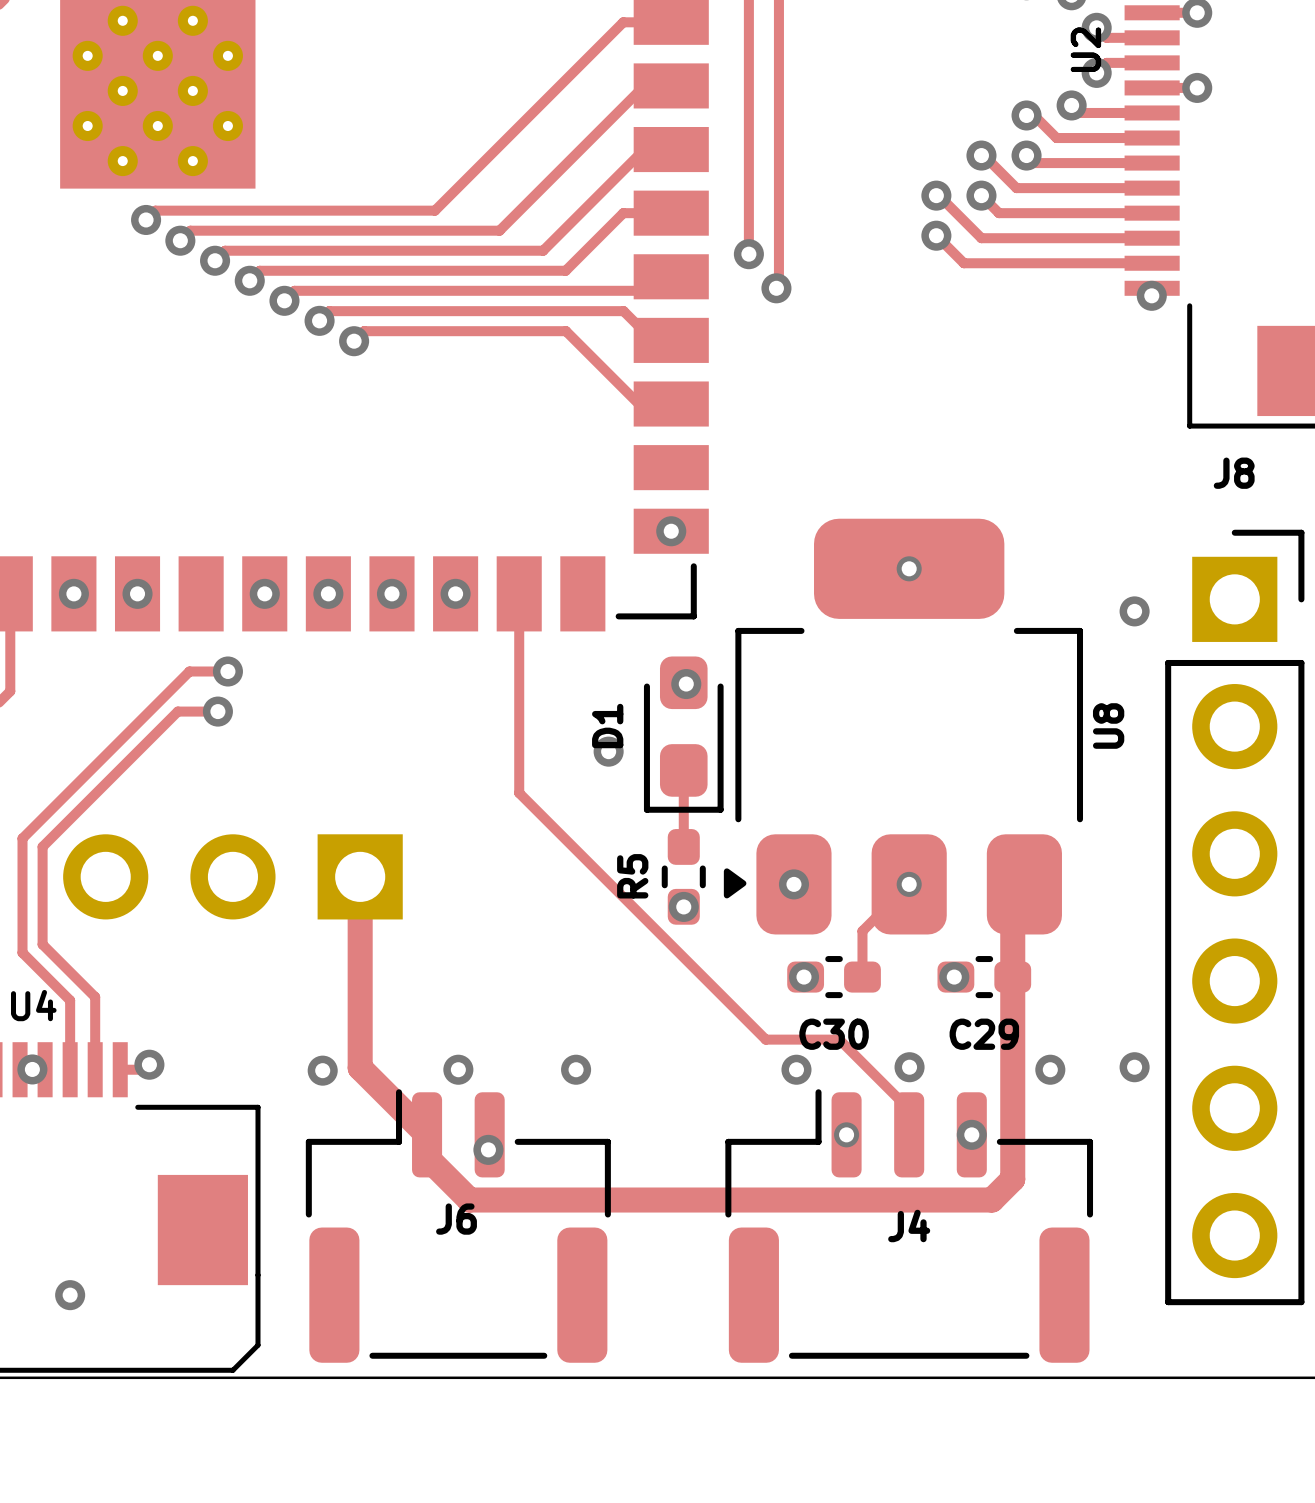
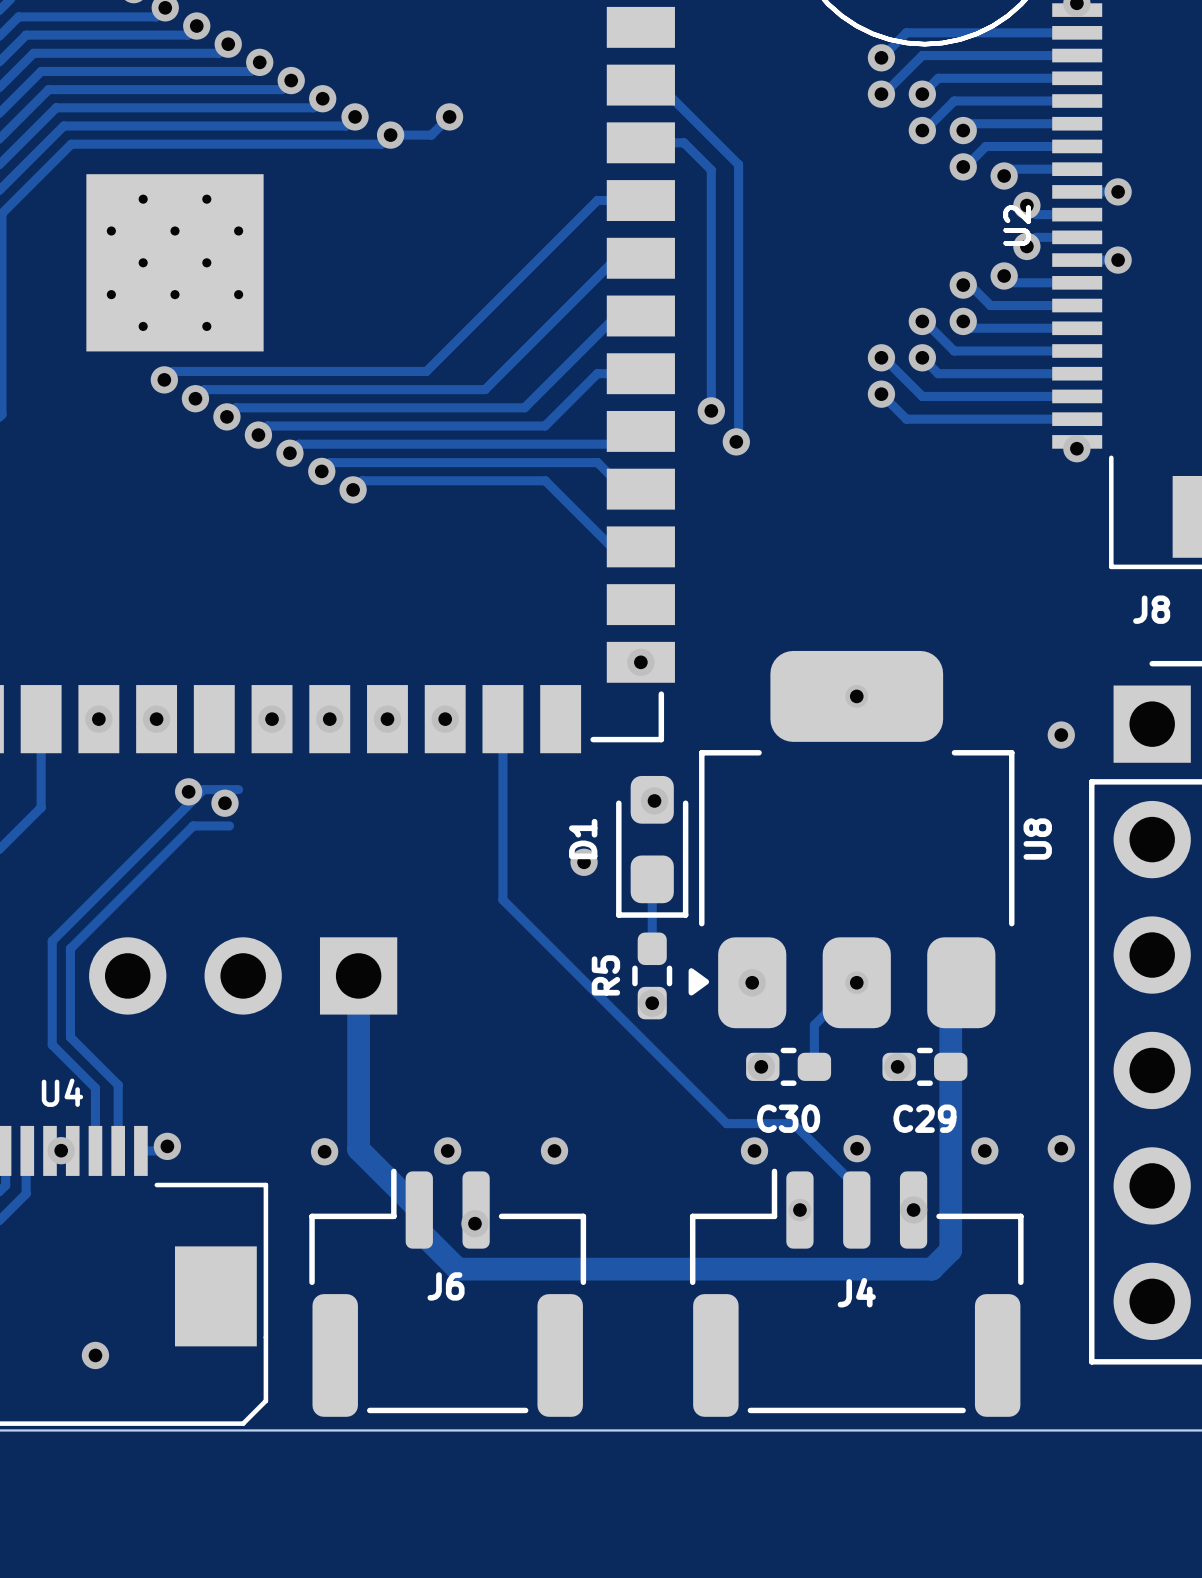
via: (227, 671) -> none
via: none -> (188, 791)
via: none -> (224, 803)
via: (217, 711) -> none

